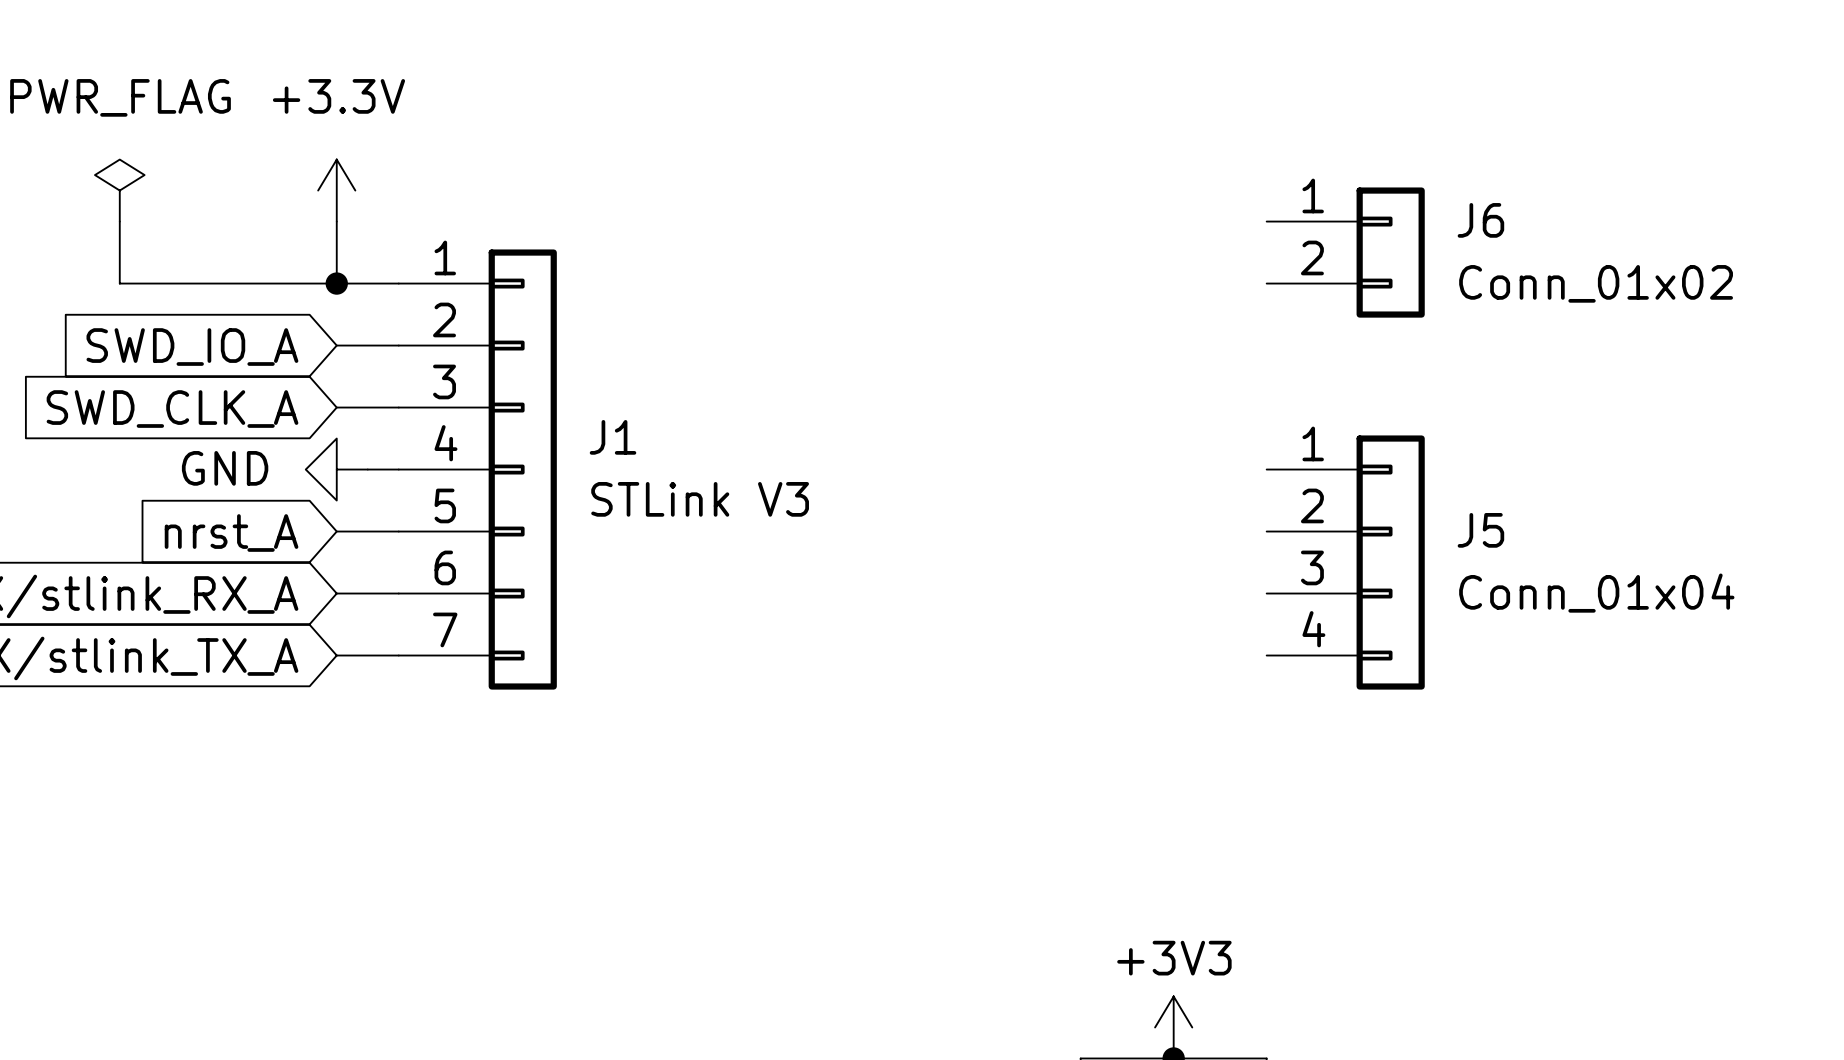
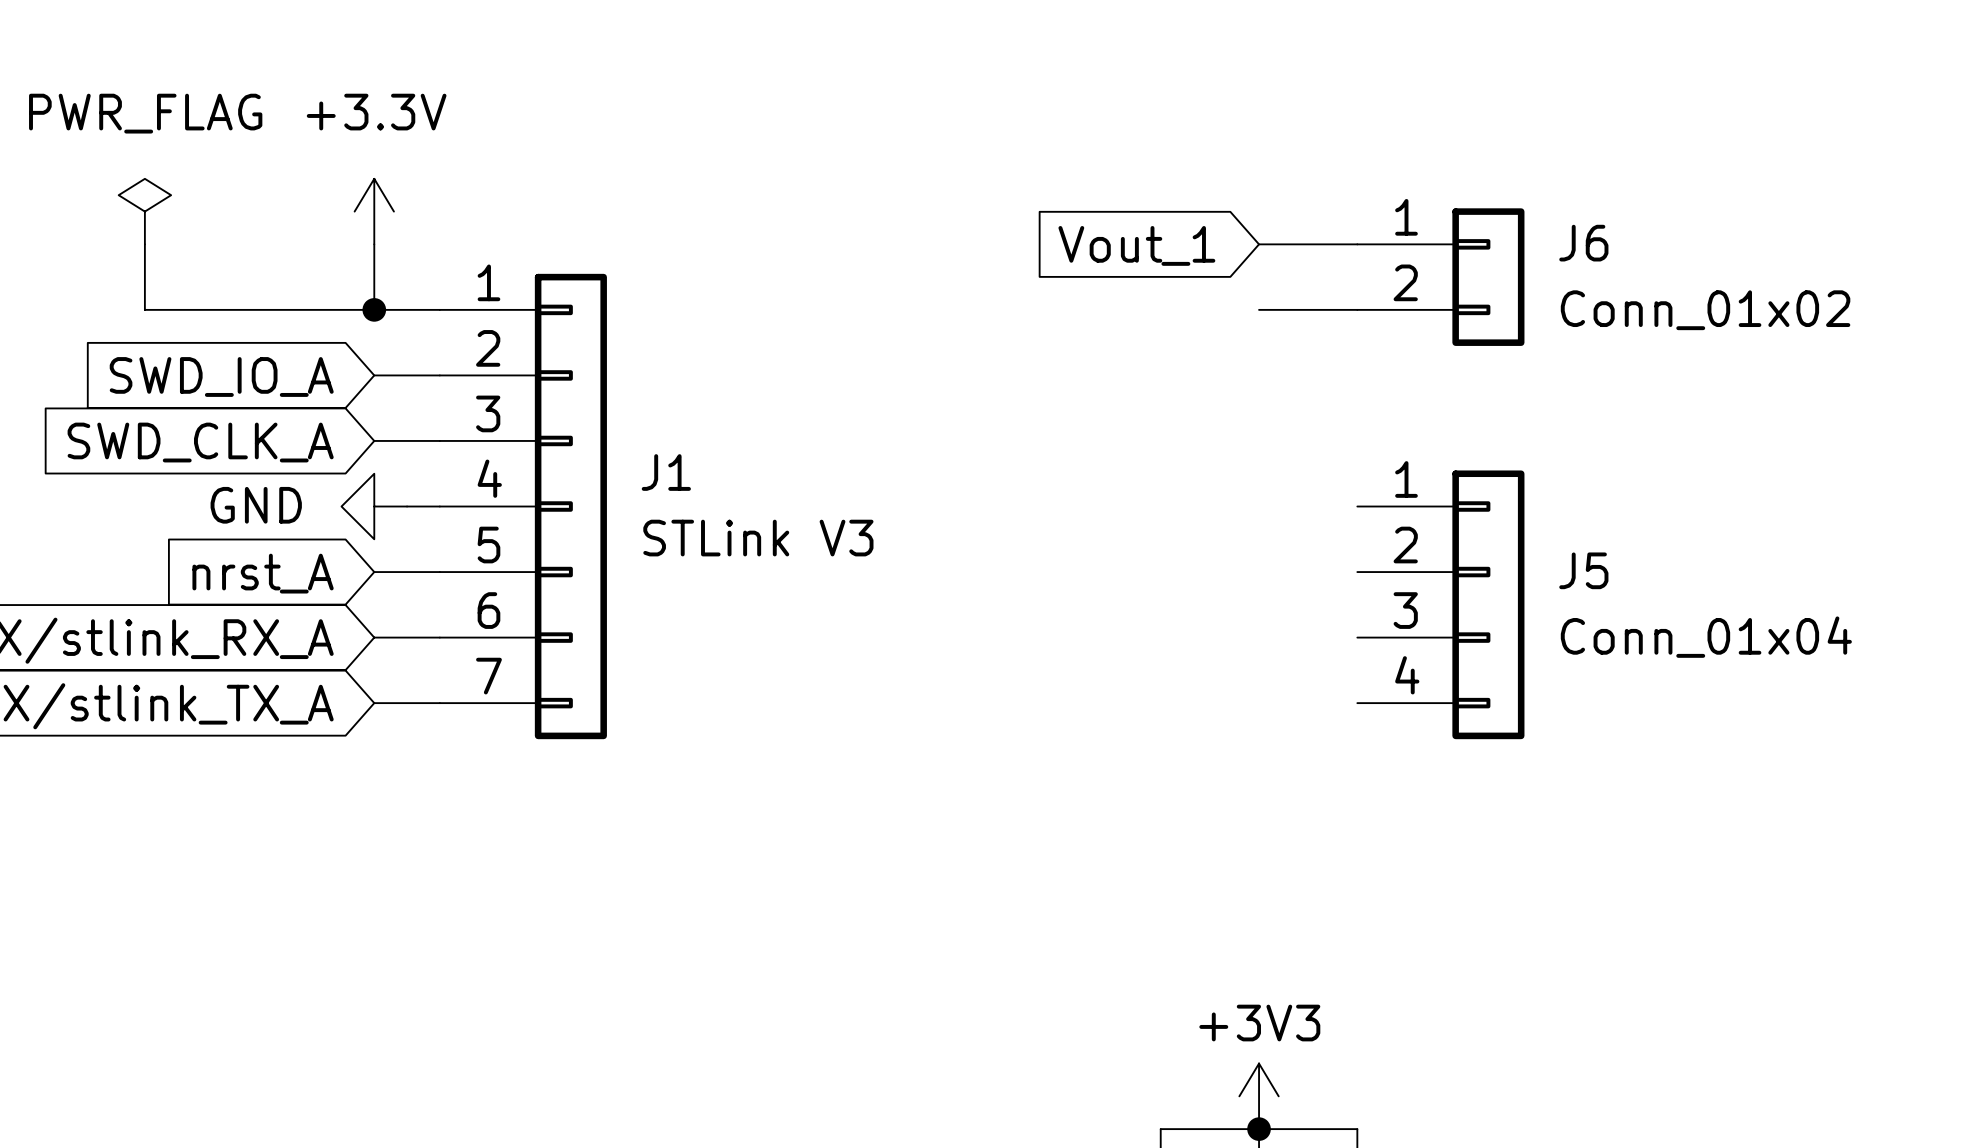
wire: none -> (1259, 244) (1357, 244)
global label: none -> Vout_1 (1136, 245)
wire: none -> (1259, 309) (1357, 309)

